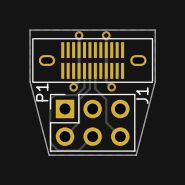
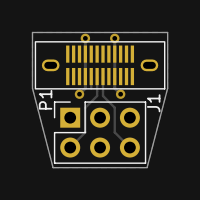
track: (84, 81) (84, 87) (76, 95) (54, 95) (50, 99) (50, 141) (58, 150) (78, 150) (92, 136) -> none

